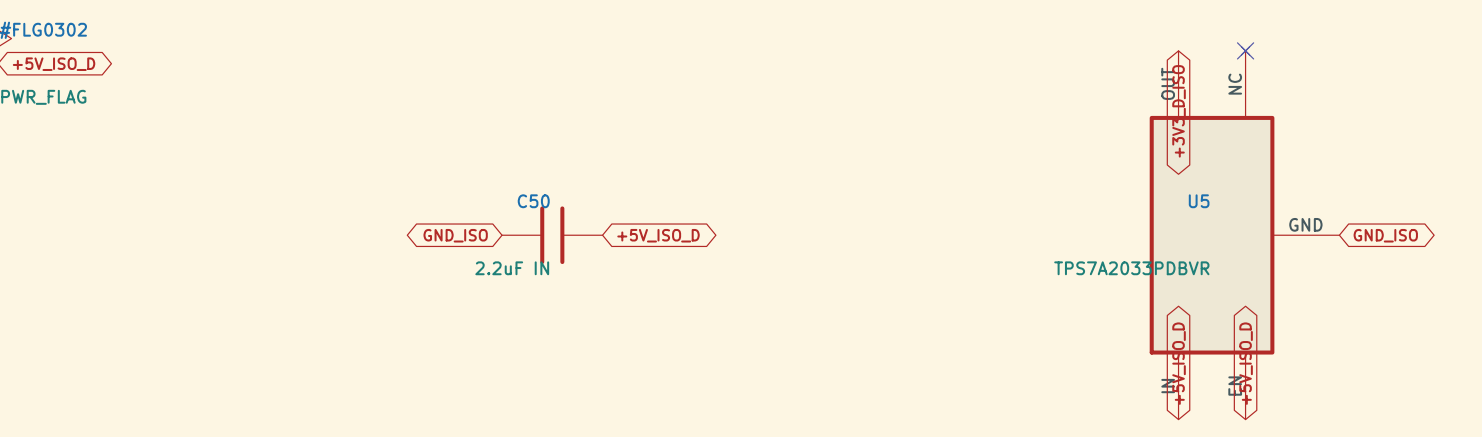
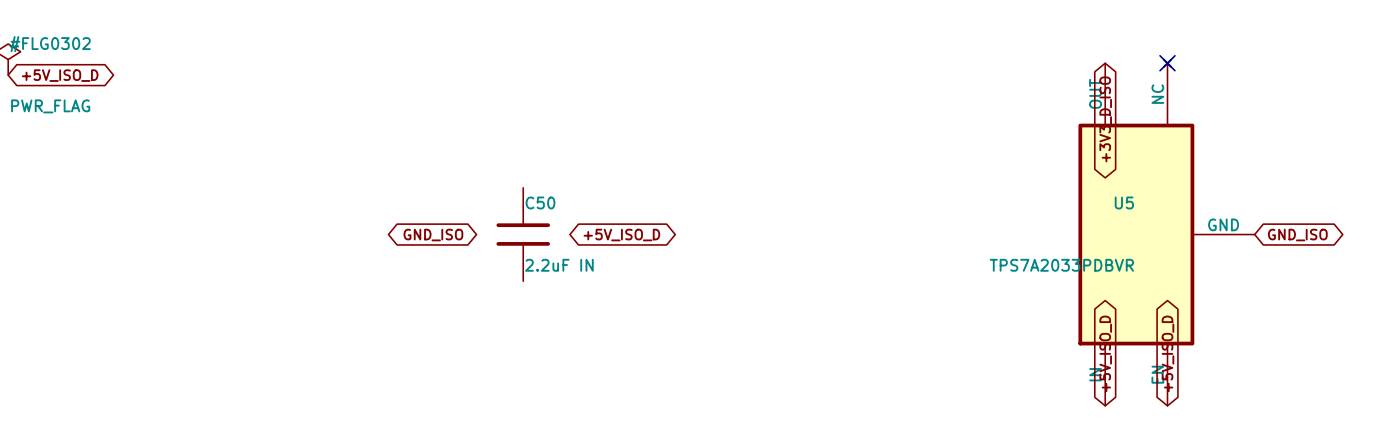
C50 rotation: 0° (552, 235) -> 90° clockwise (523, 234)
C50 value position: 2.2uF IN (512, 268) -> 2.2uF IN (559, 265)

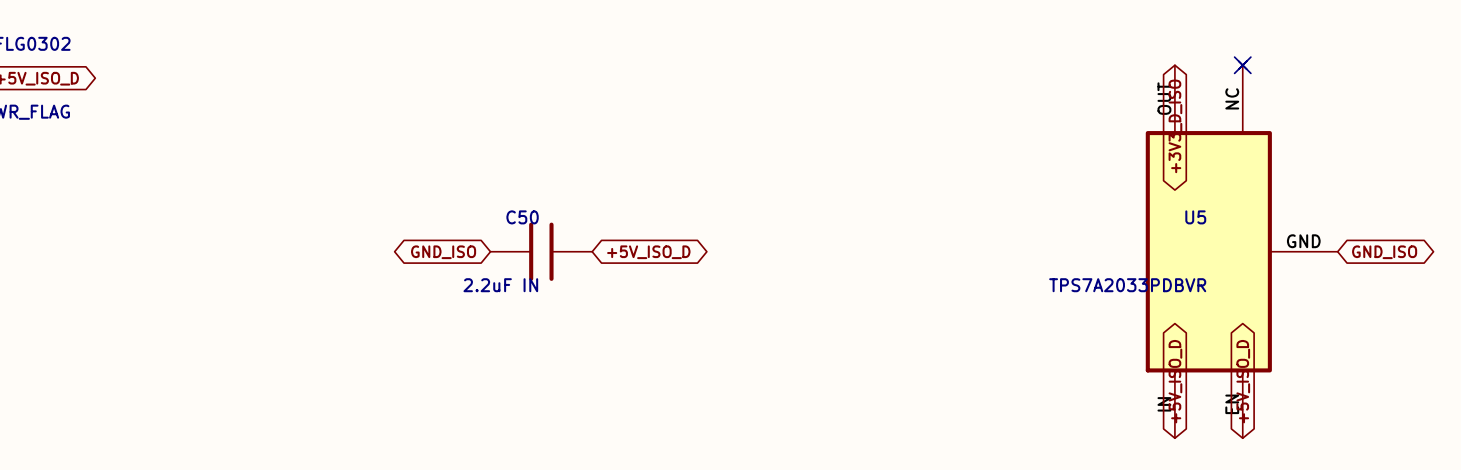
C50 name position: C50 (540, 202) -> C50 (522, 217)
C50 rotation: 0° (523, 234) -> 90° clockwise (541, 251)

